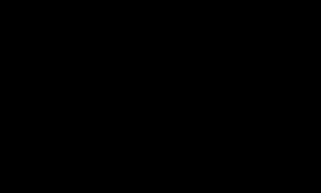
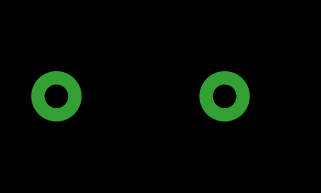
part: none -> (56, 96)
part: none -> (224, 96)

